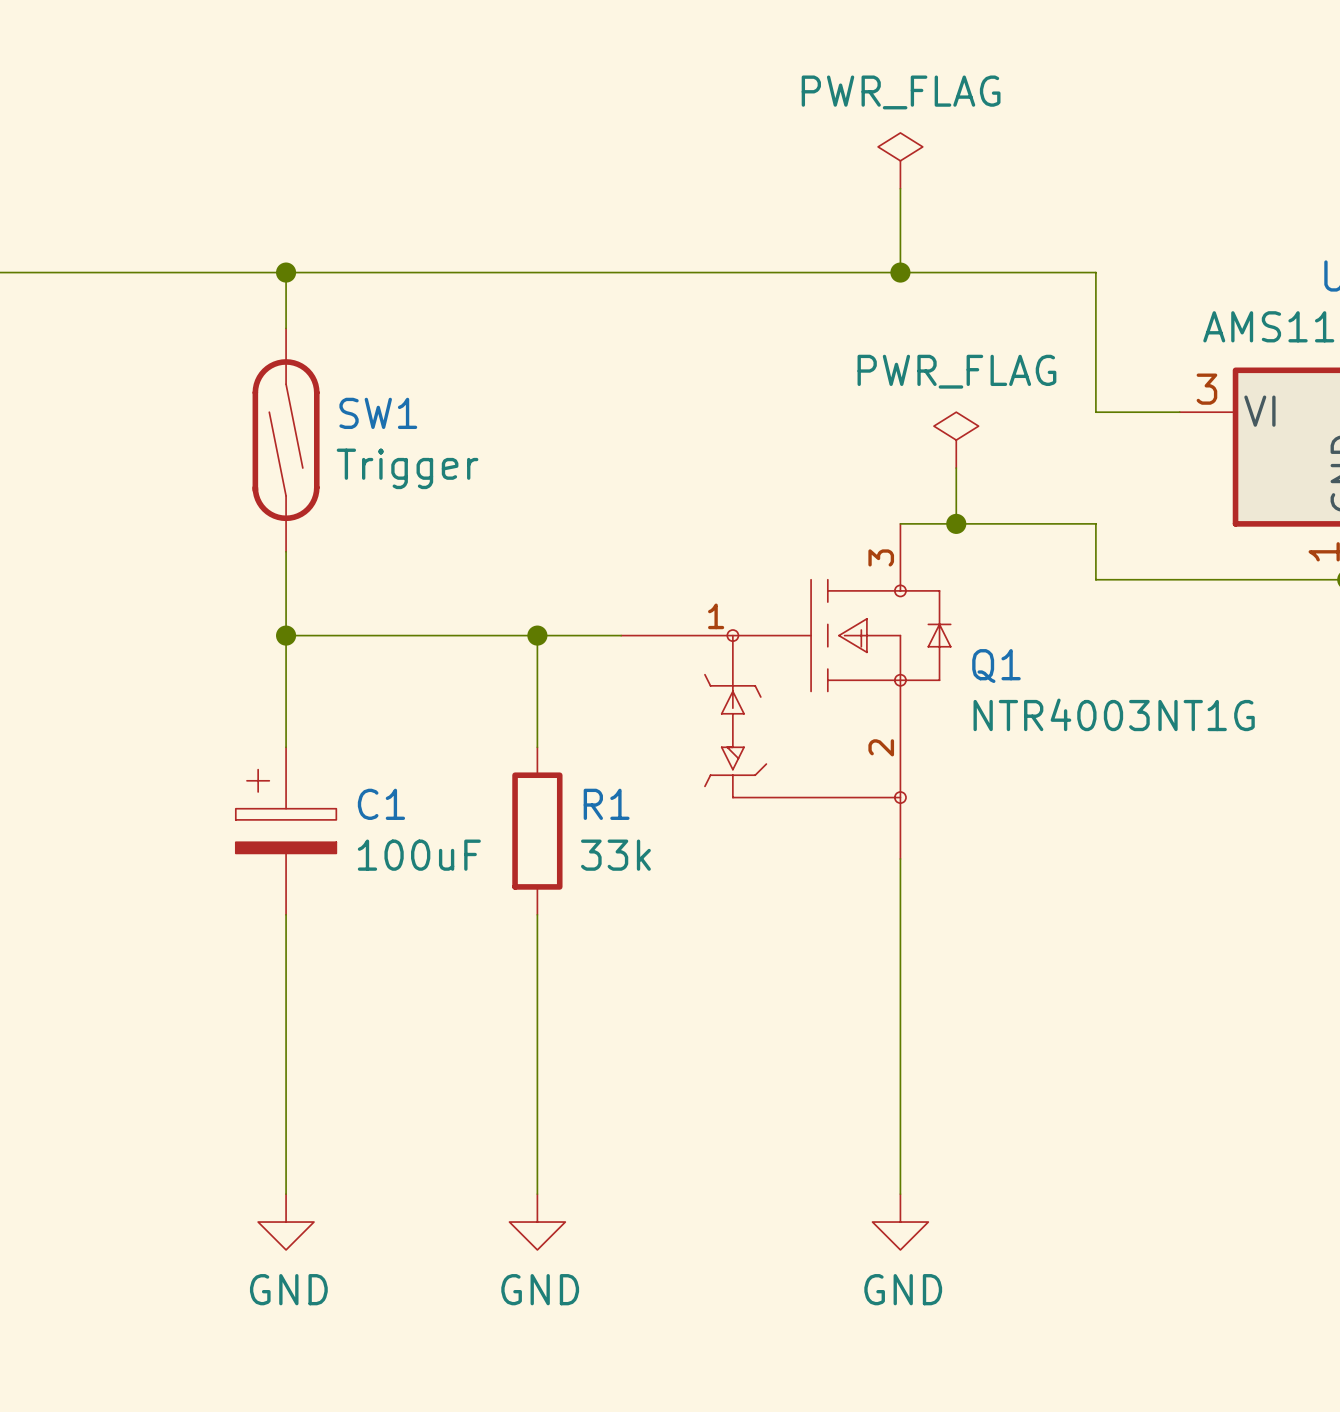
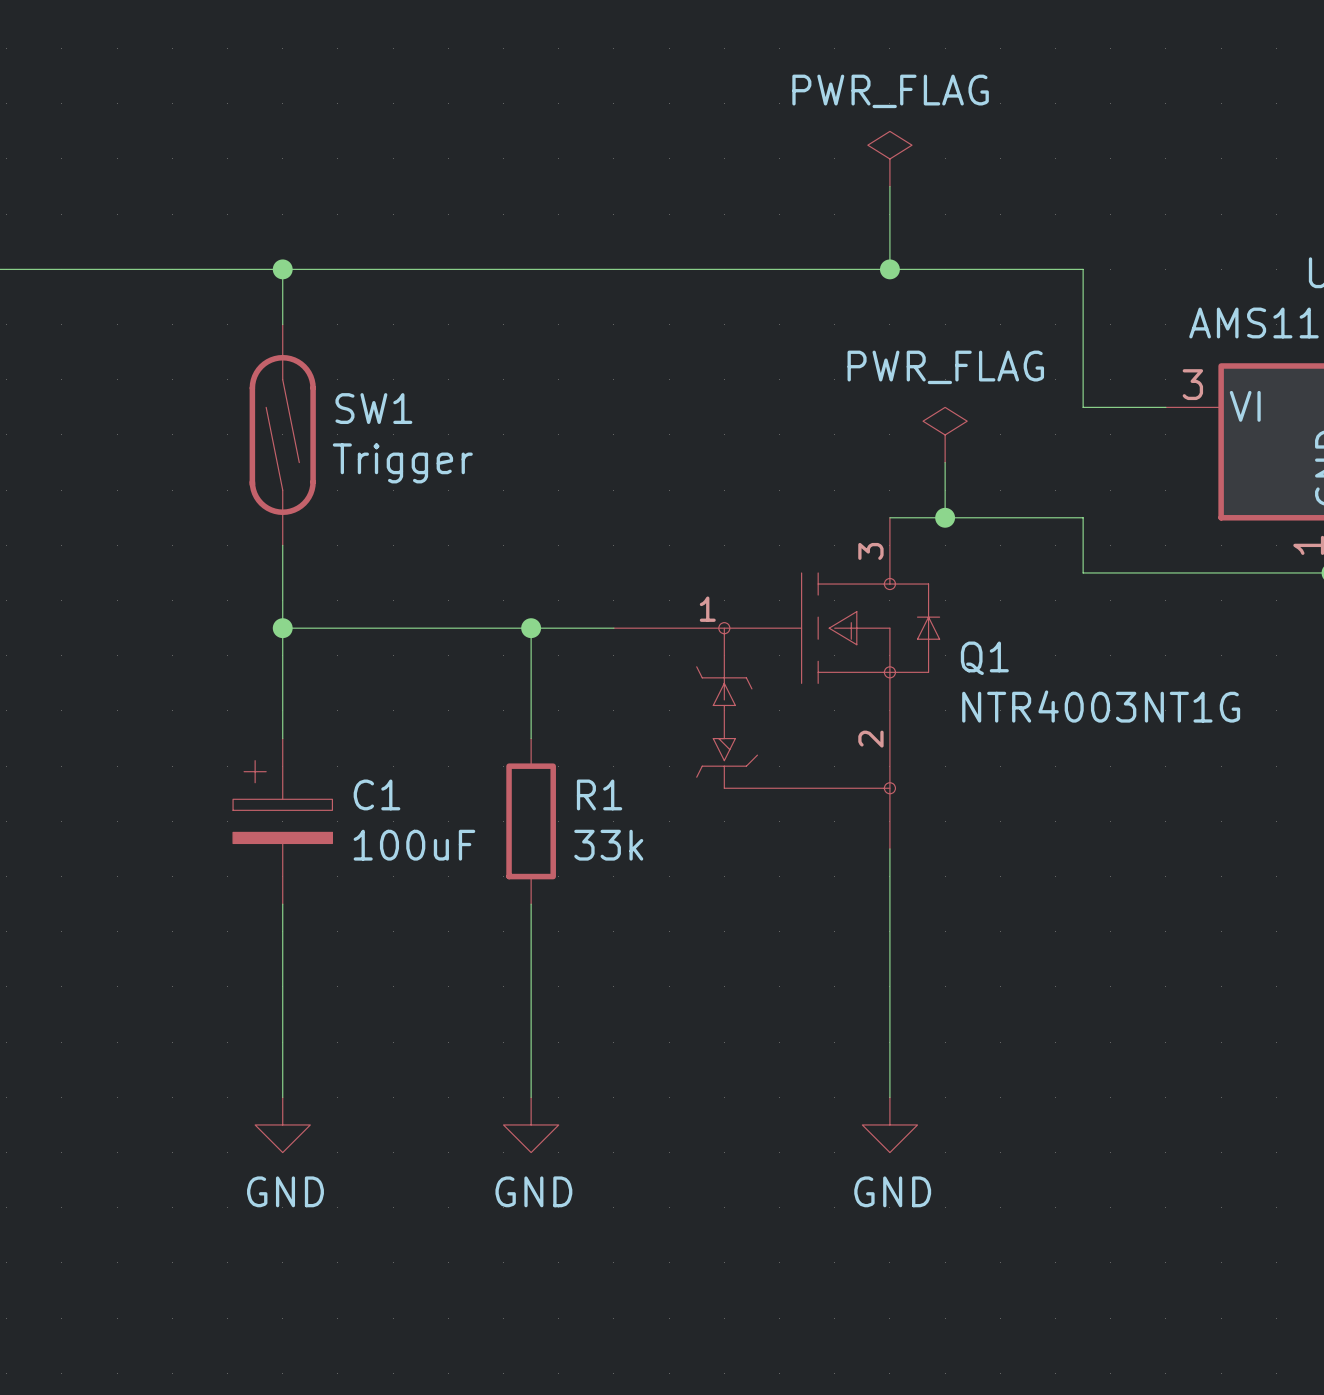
wire: (286, 1110) (286, 1194) -> none
wire: (537, 1110) (537, 1194) -> none
wire: (900, 1110) (900, 1194) -> none
power symbol position: GND (286, 1222) -> GND (282, 1124)
power symbol position: GND (537, 1222) -> GND (531, 1124)
power symbol position: GND (900, 1222) -> GND (889, 1124)

